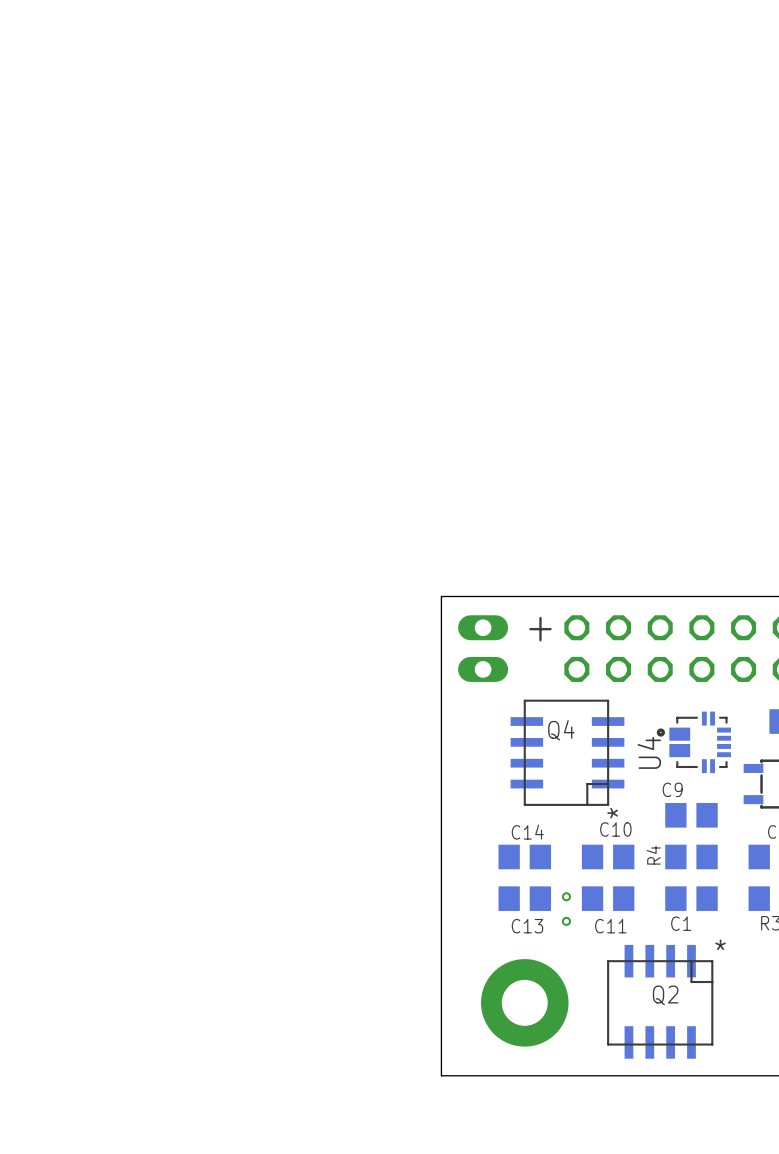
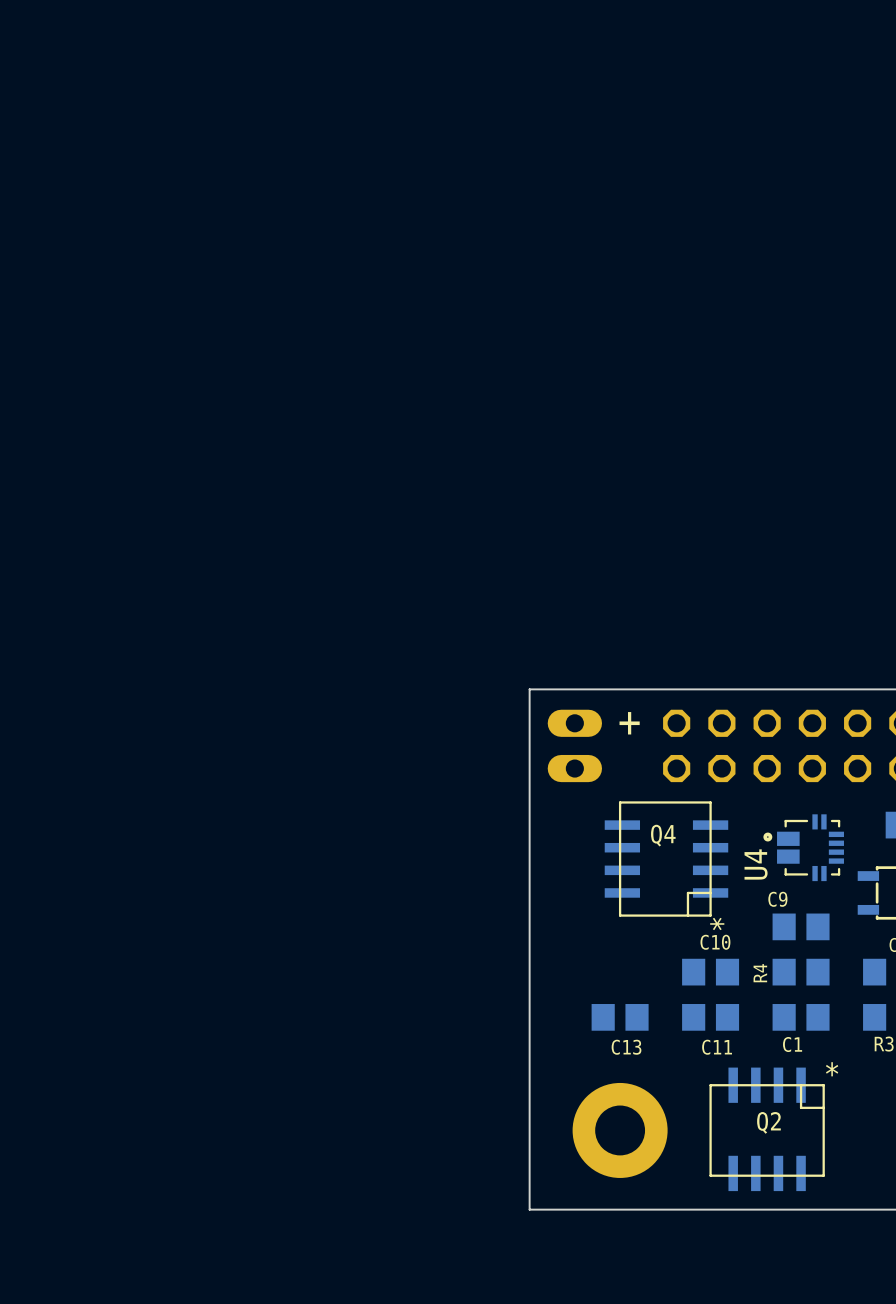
C14: (524, 856) -> none
part: (566, 909) -> none

